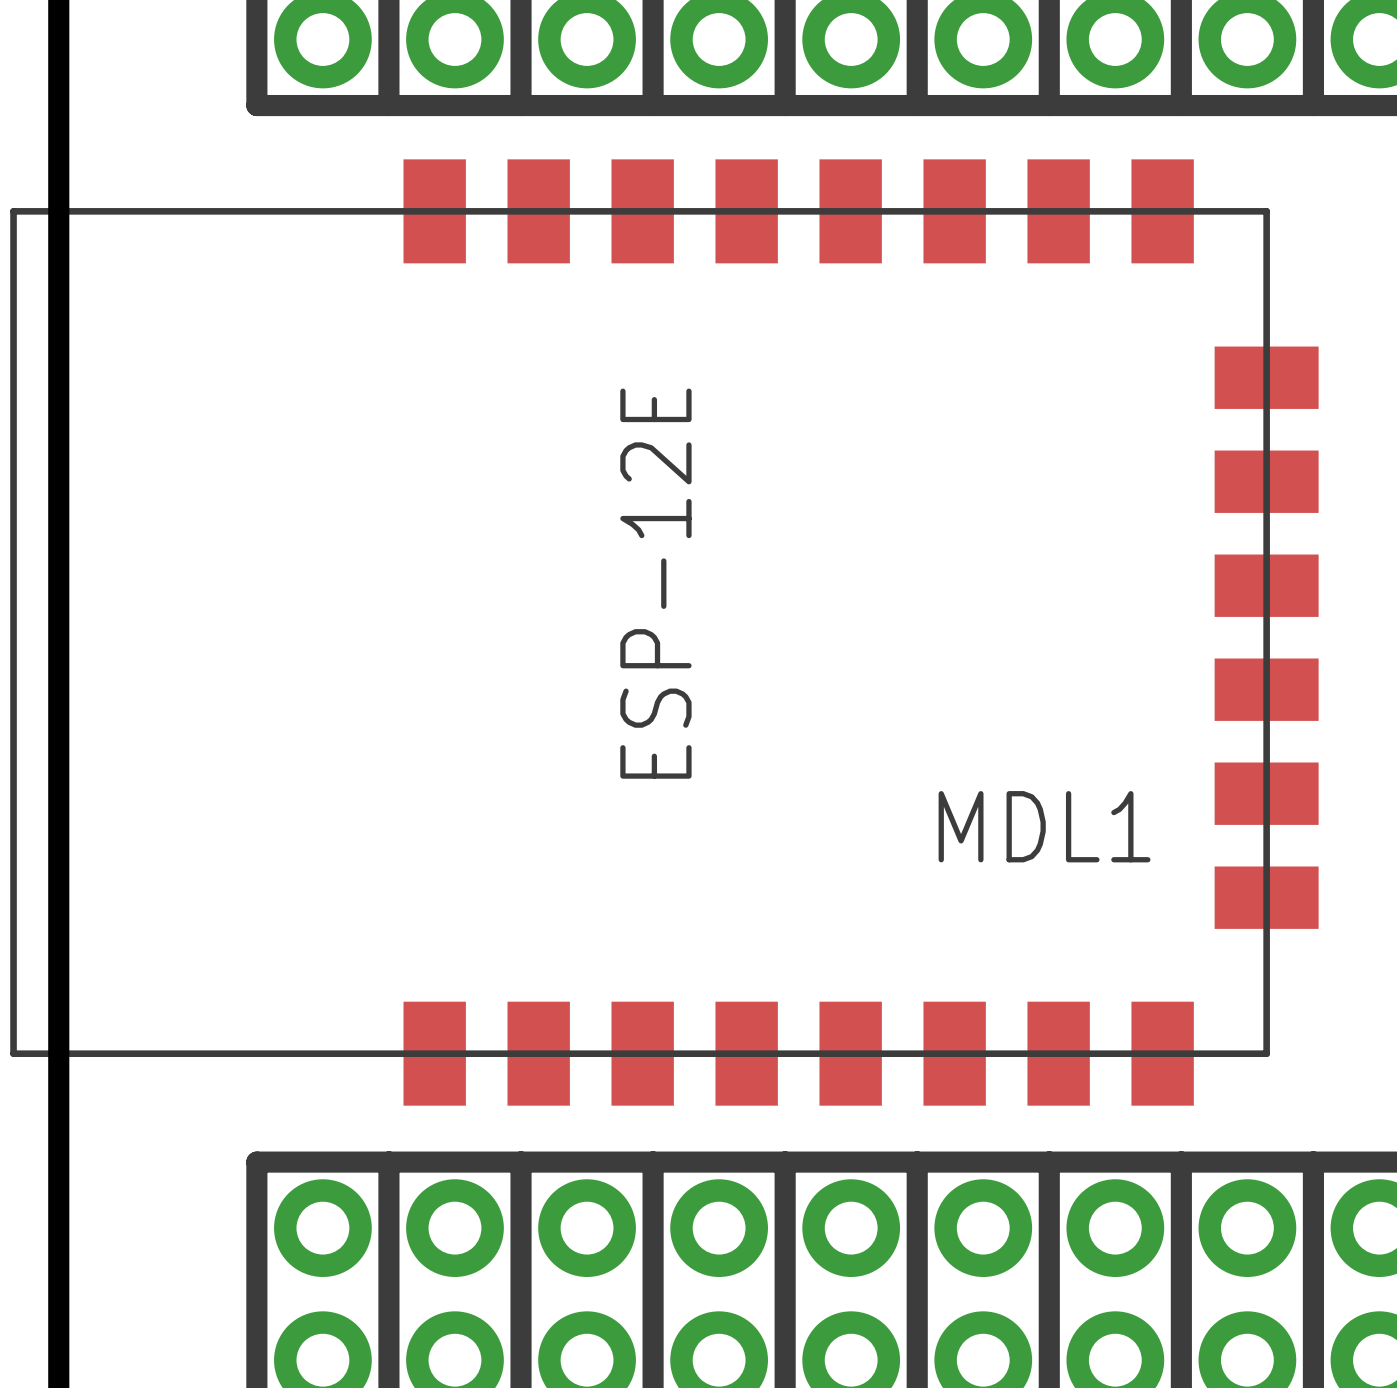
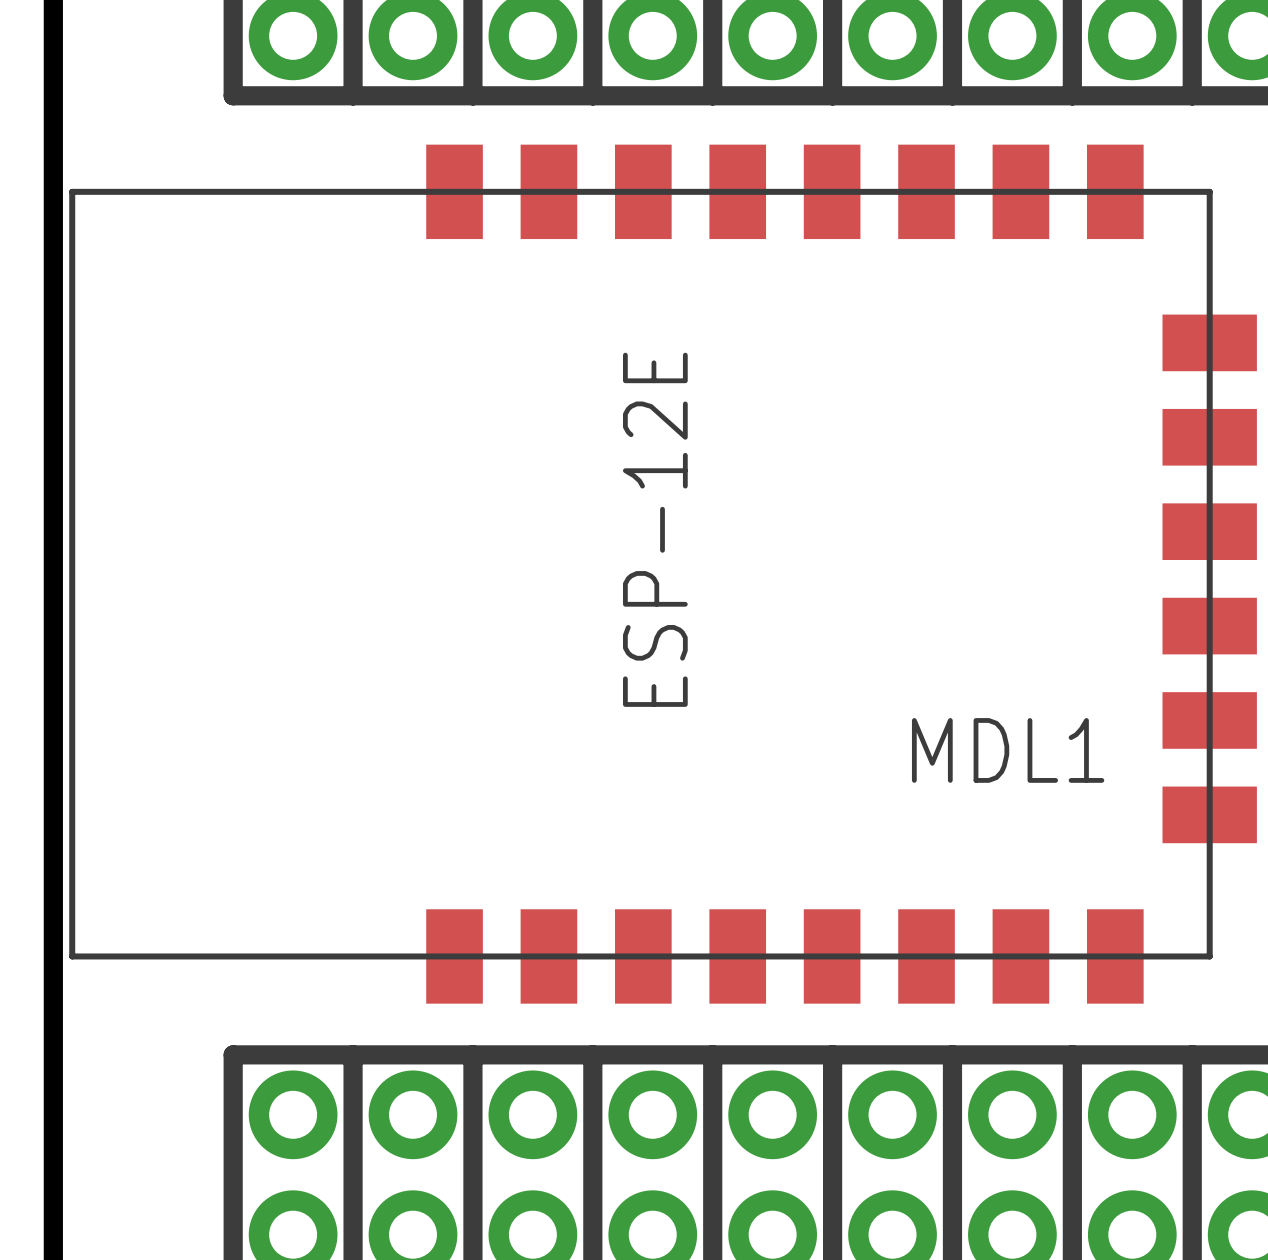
MDL1 position: (664, 632) -> (663, 574)

